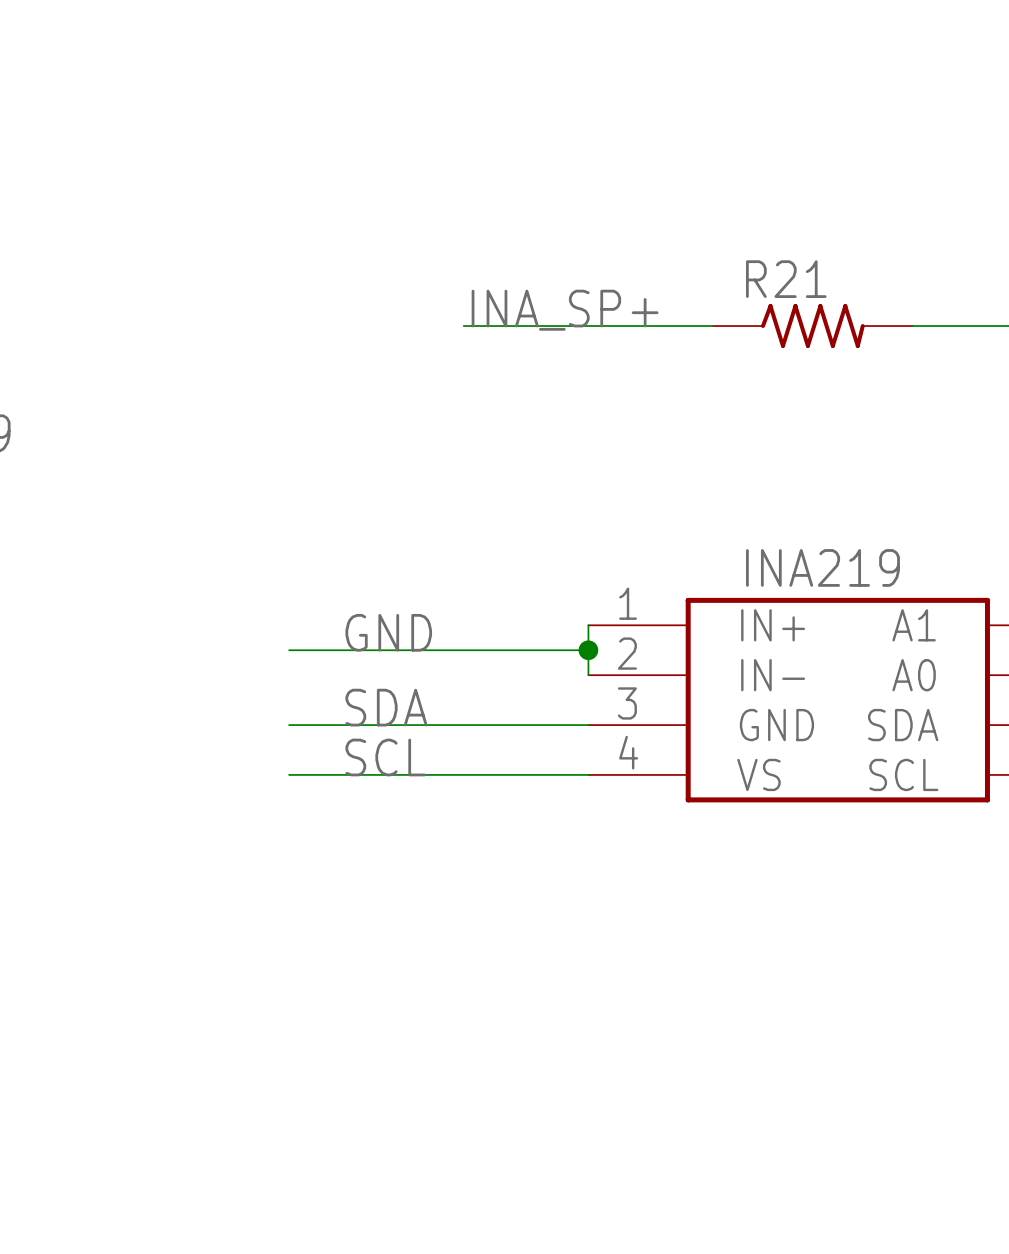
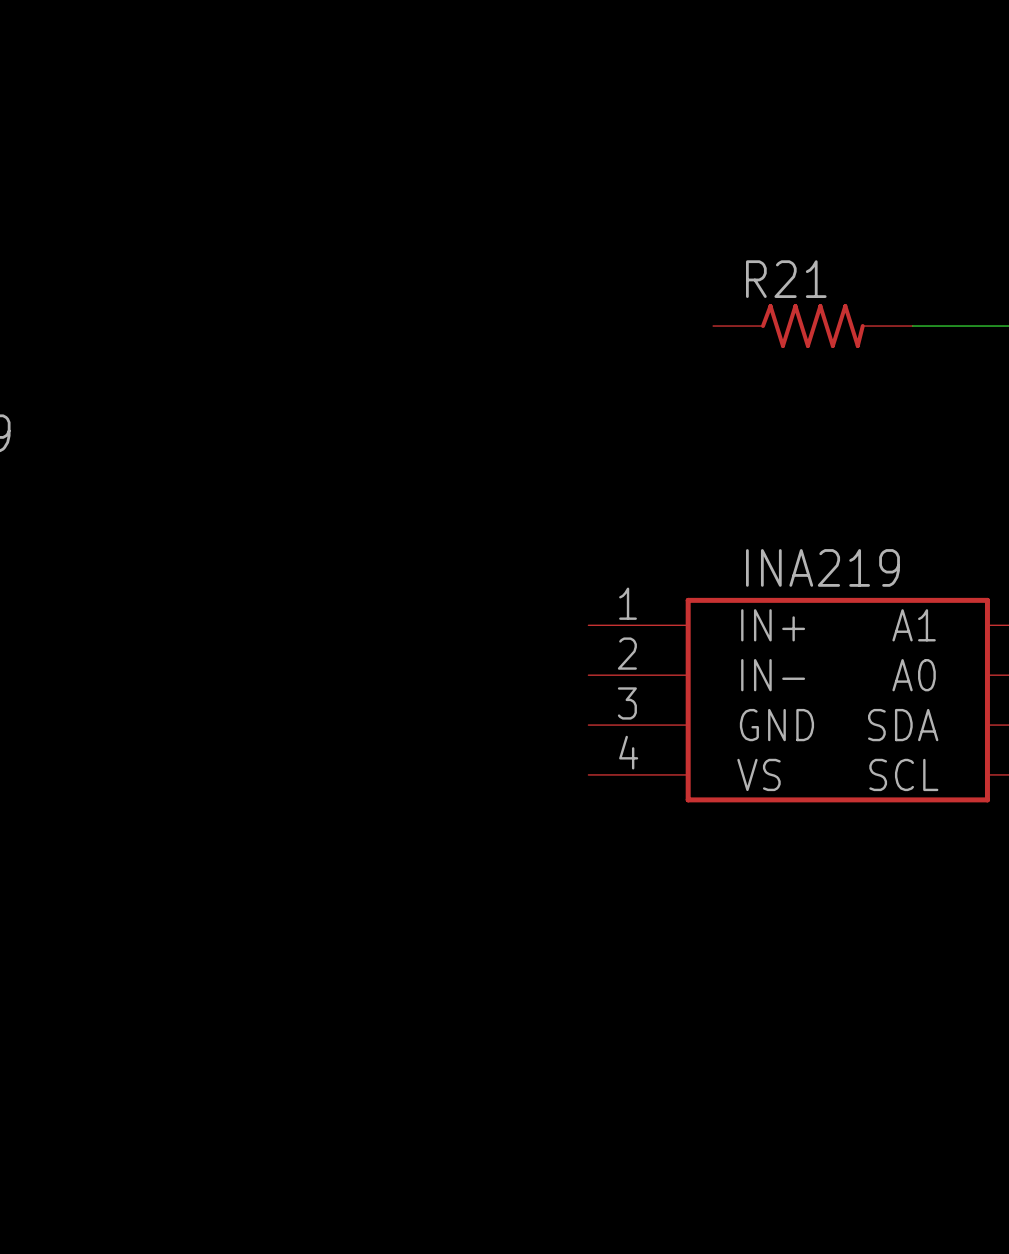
label: INA_SP+ (565, 310) -> none
wire: (463, 326) (713, 326) -> none
wire: (588, 625) (588, 675) -> none
label: GND (388, 632) -> none
wire: (289, 650) (588, 650) -> none
junction: (588, 650) -> none
label: SDA (386, 707) -> none
wire: (289, 725) (588, 725) -> none
label: SCL (385, 757) -> none
wire: (289, 774) (588, 774) -> none

